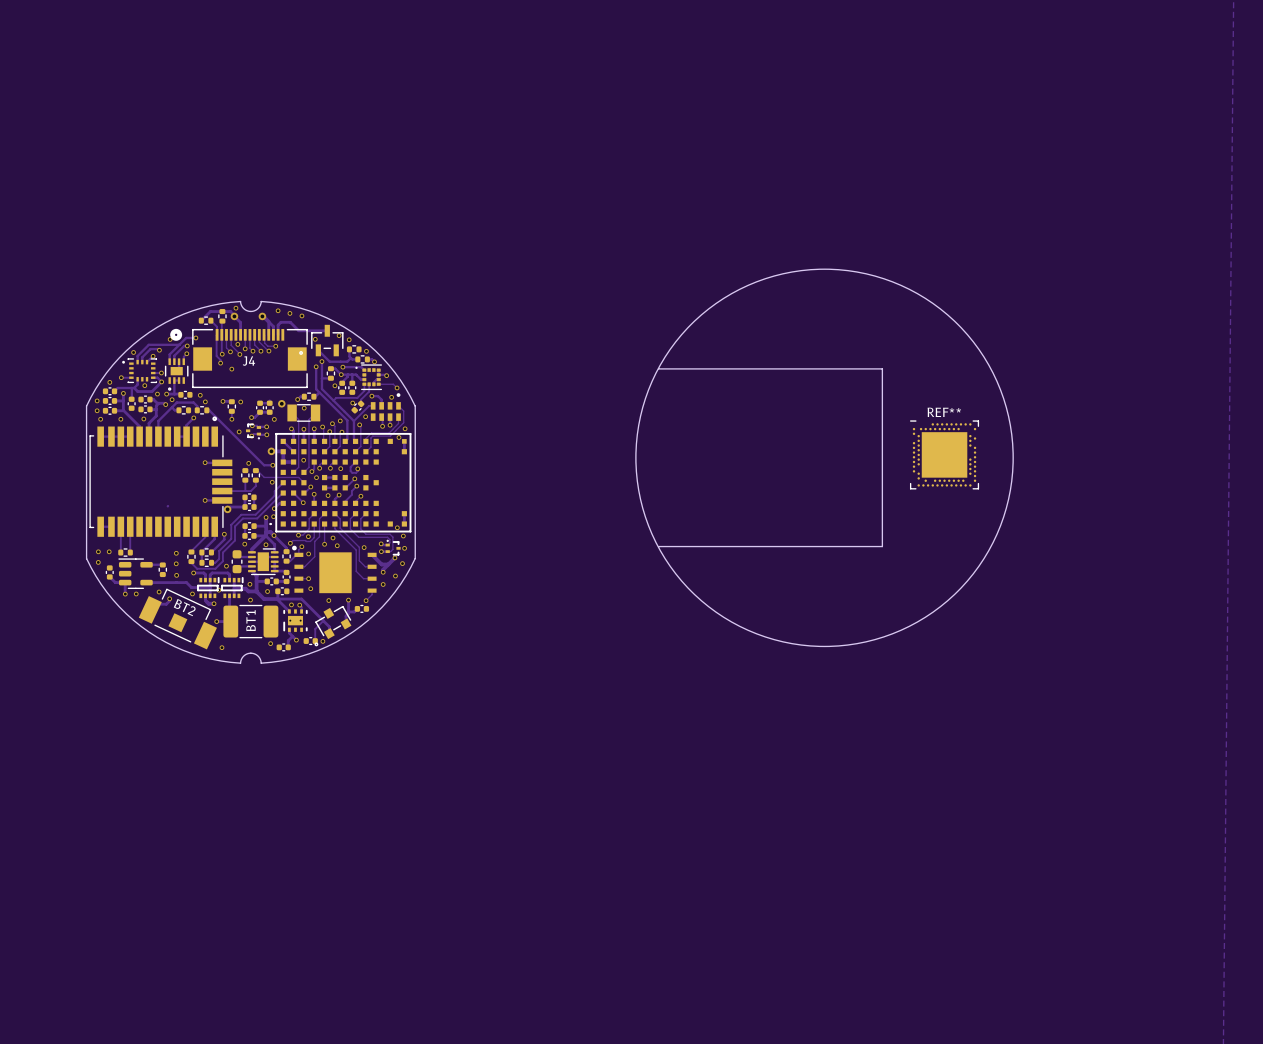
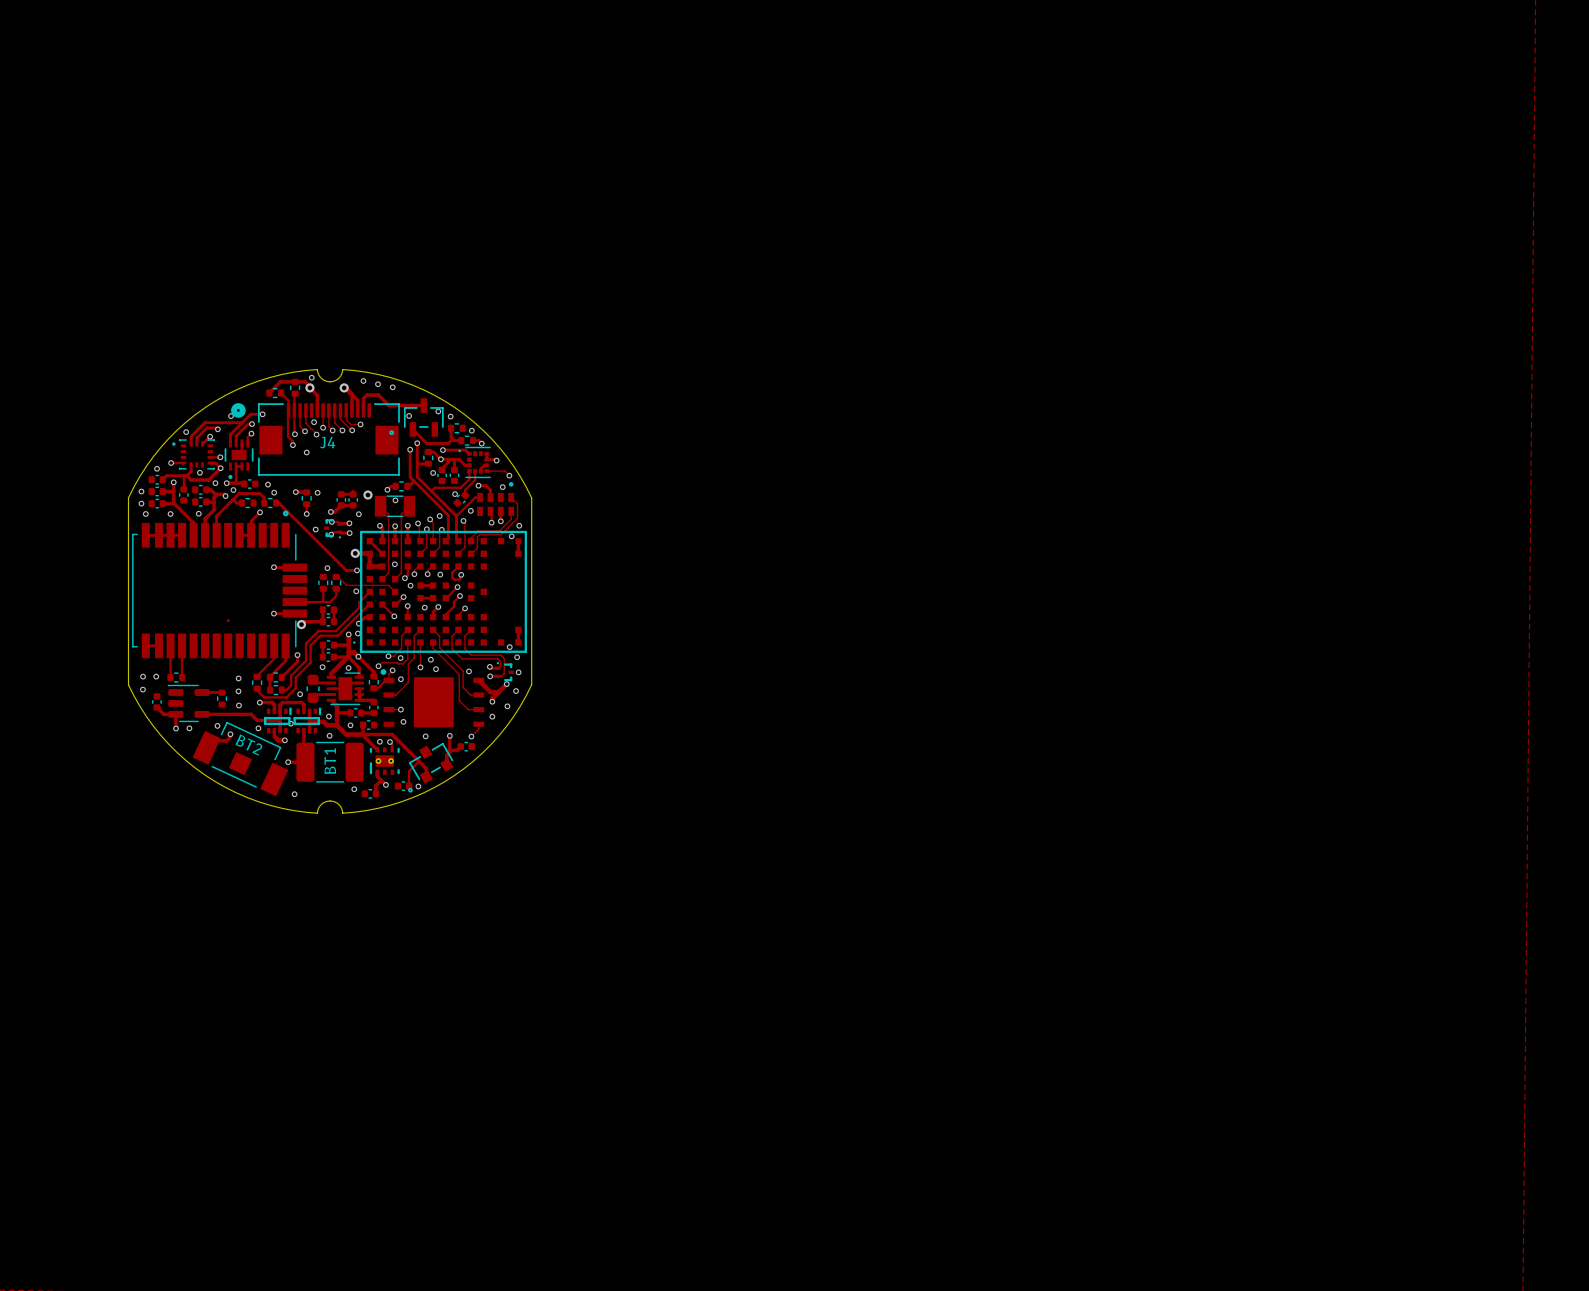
round board edge: [635, 268, 1014, 647] -> none
board edge: (658, 368) (882, 368) (882, 546) (658, 546) -> none
REF**: (944, 454) -> none

